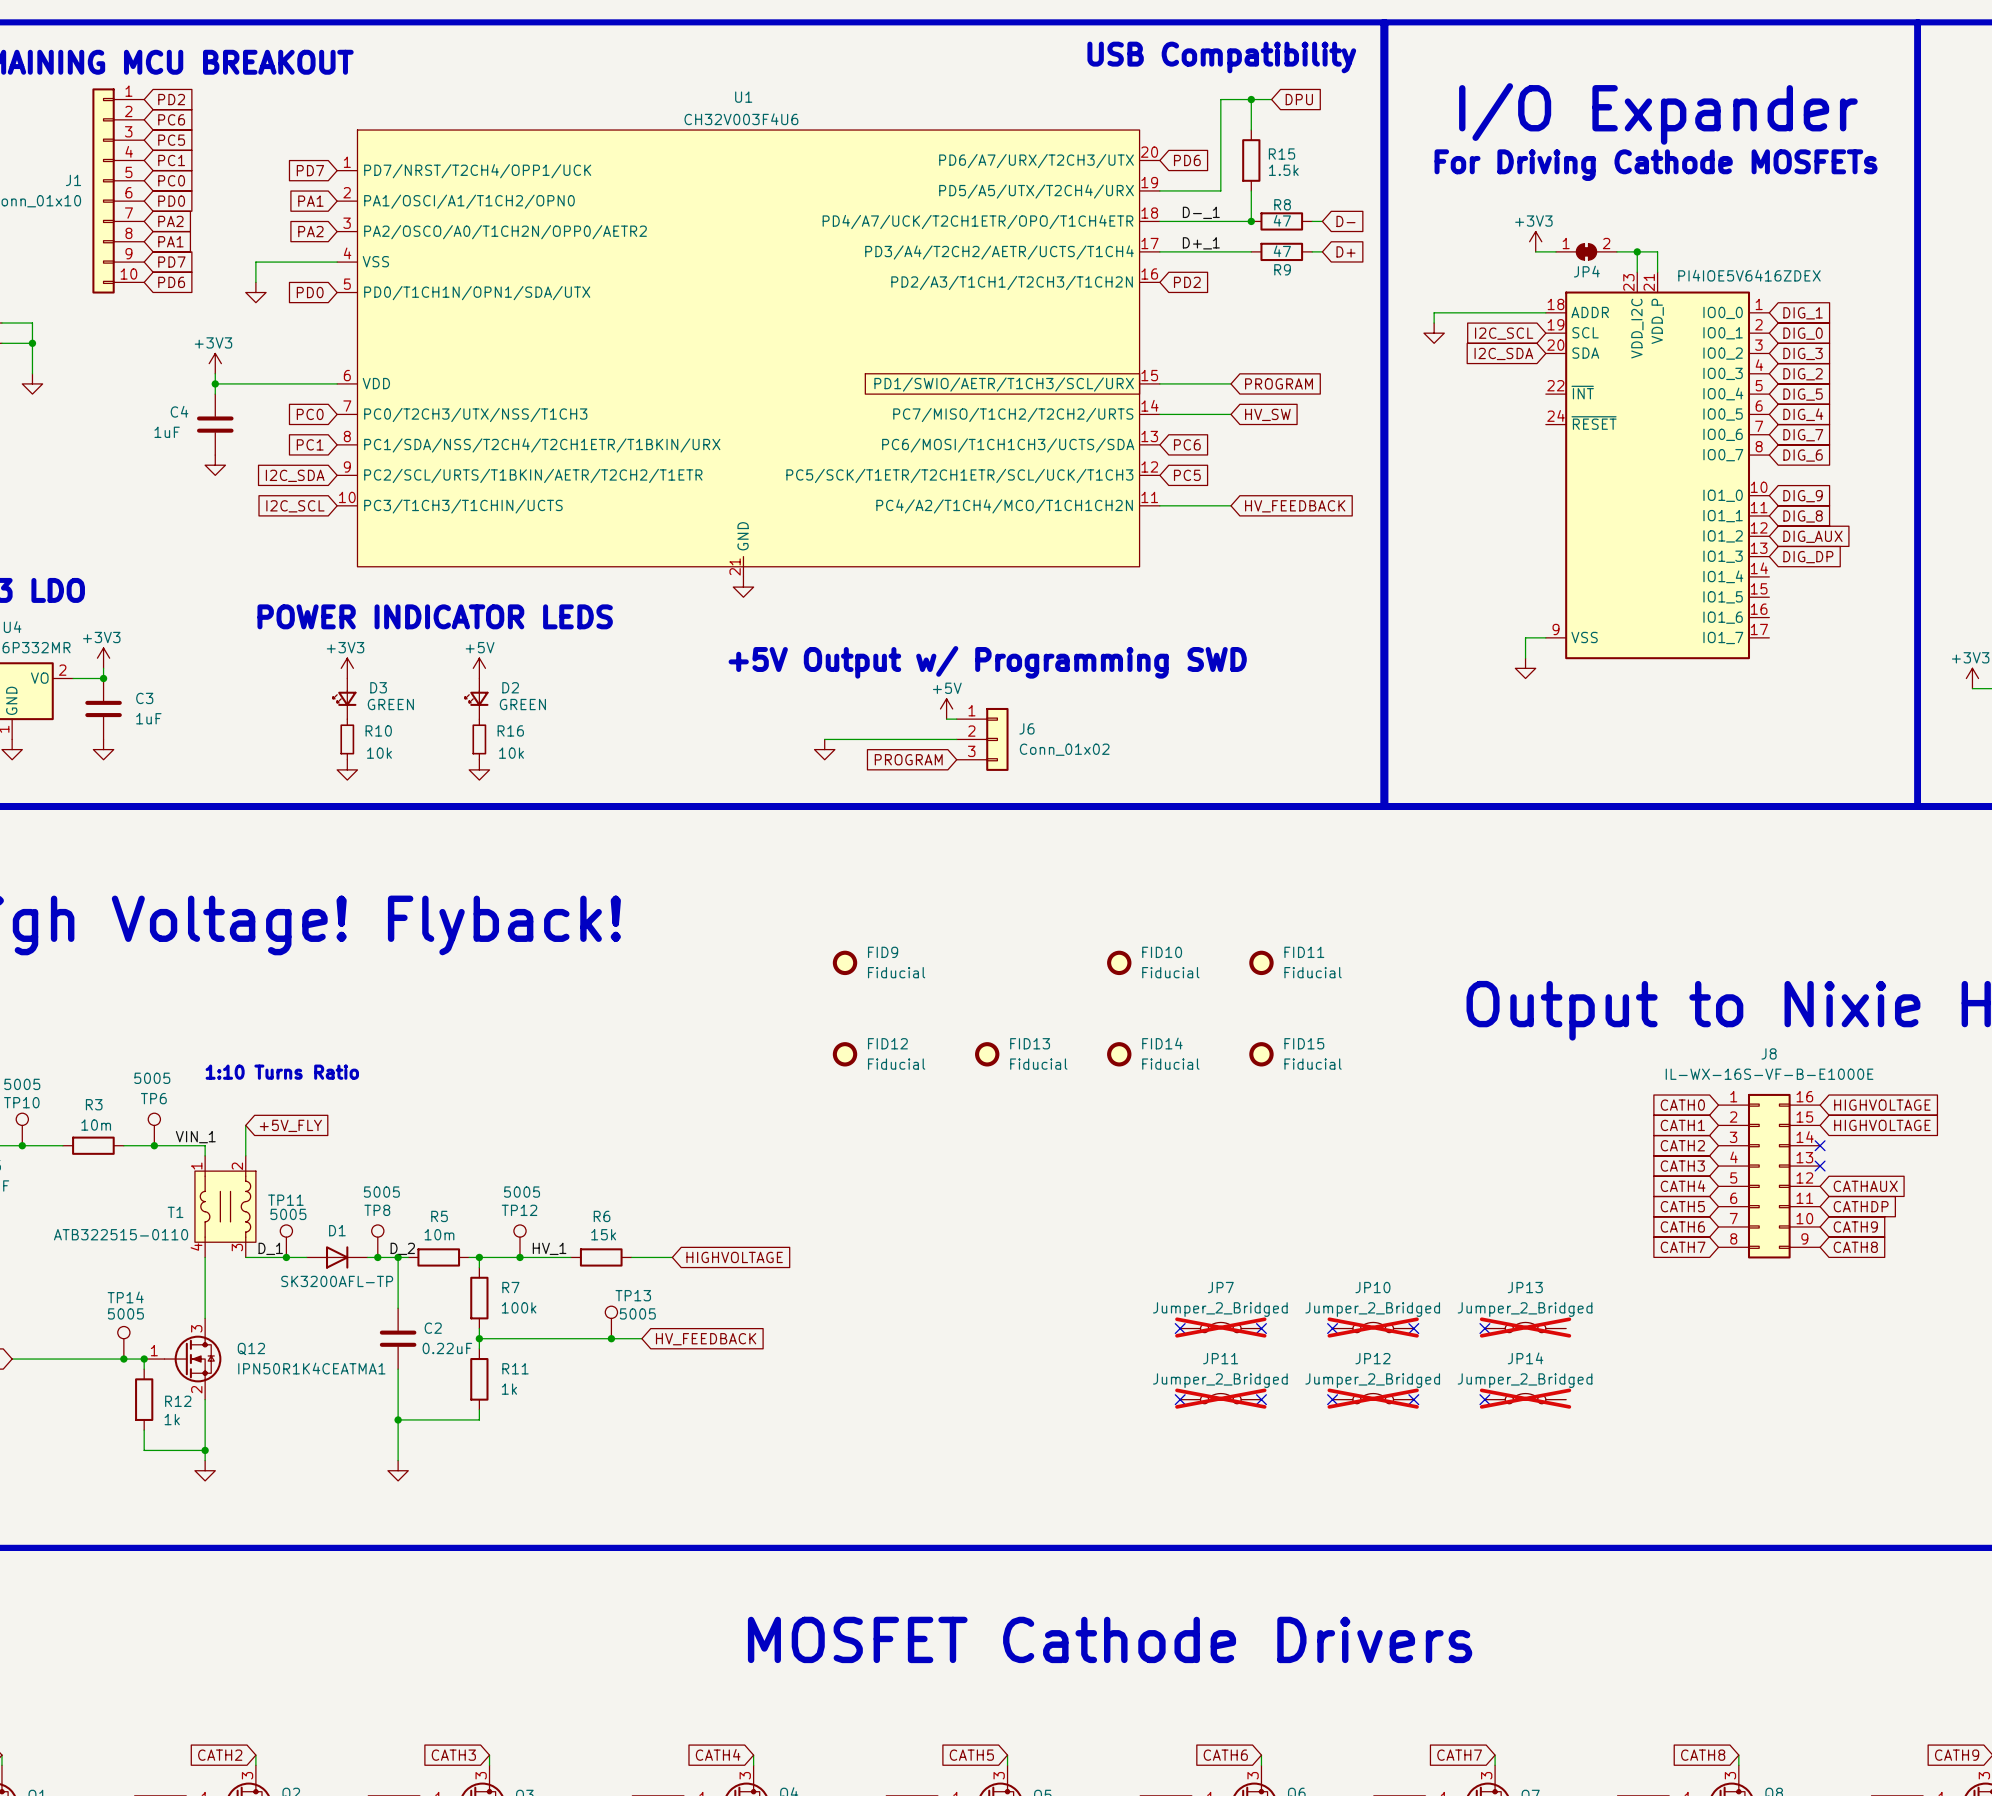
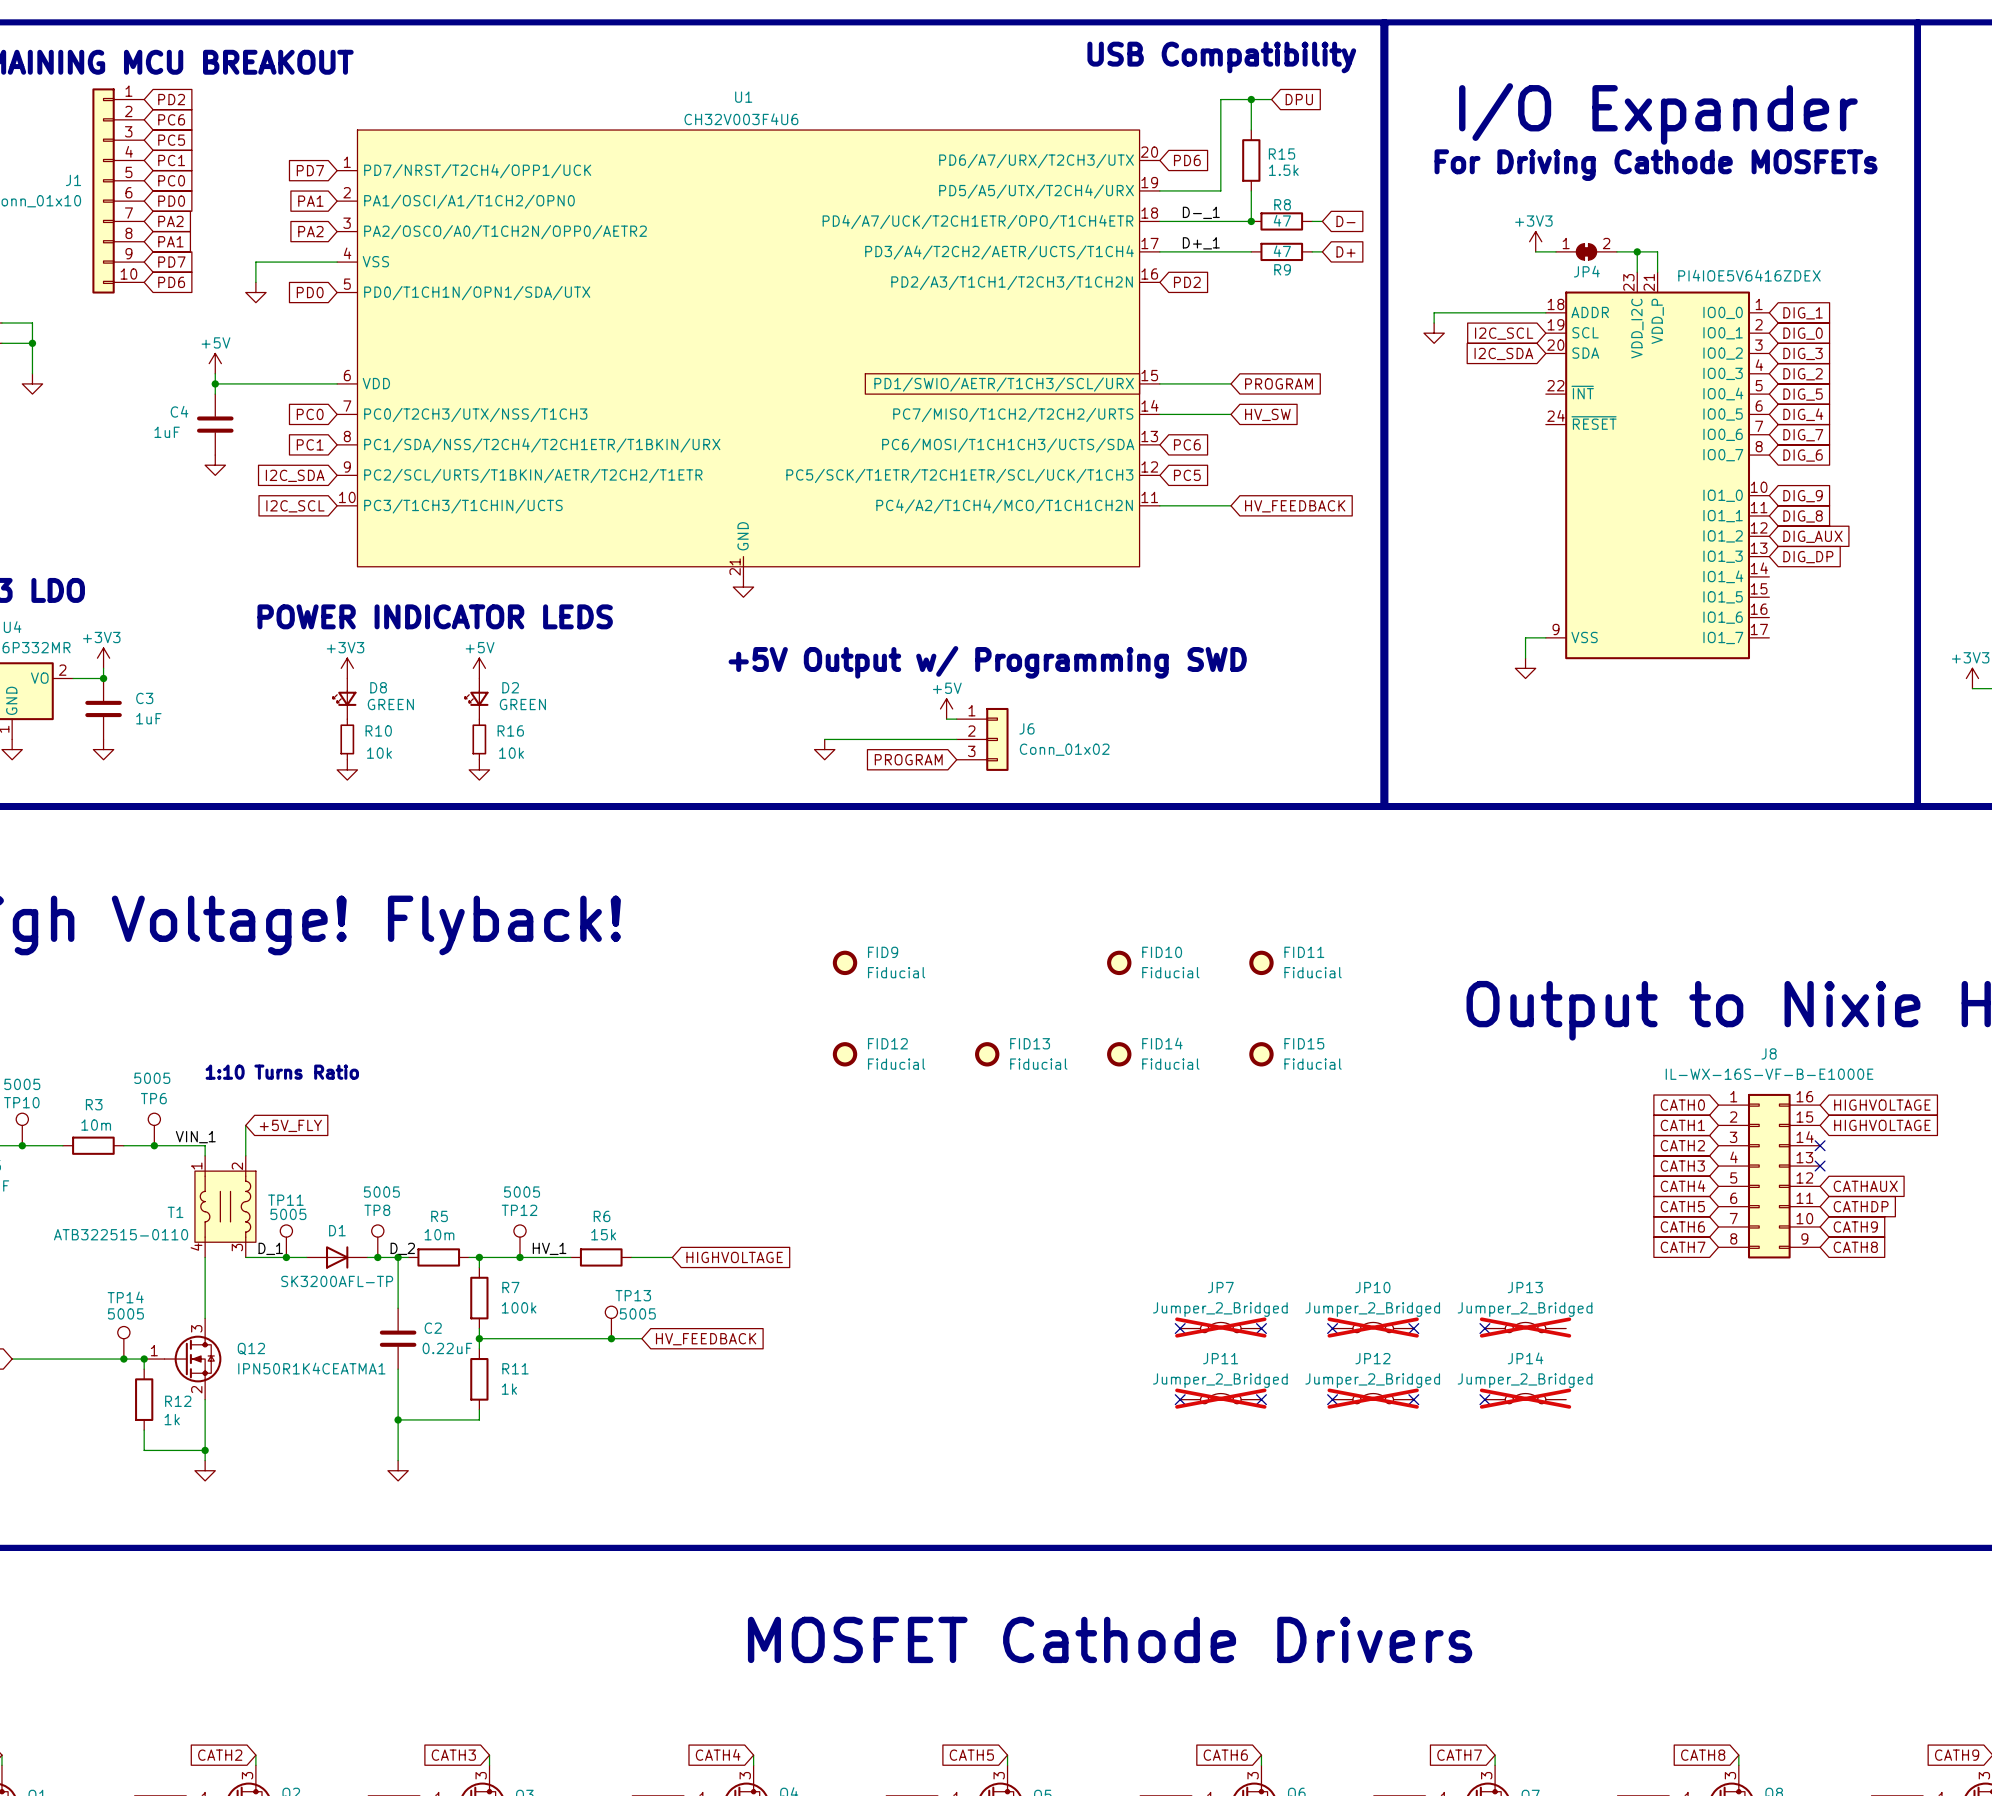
power symbol: +3V3 (215, 363) -> +5V (215, 363)
D3 name: D3 (378, 687) -> D8 (378, 687)

